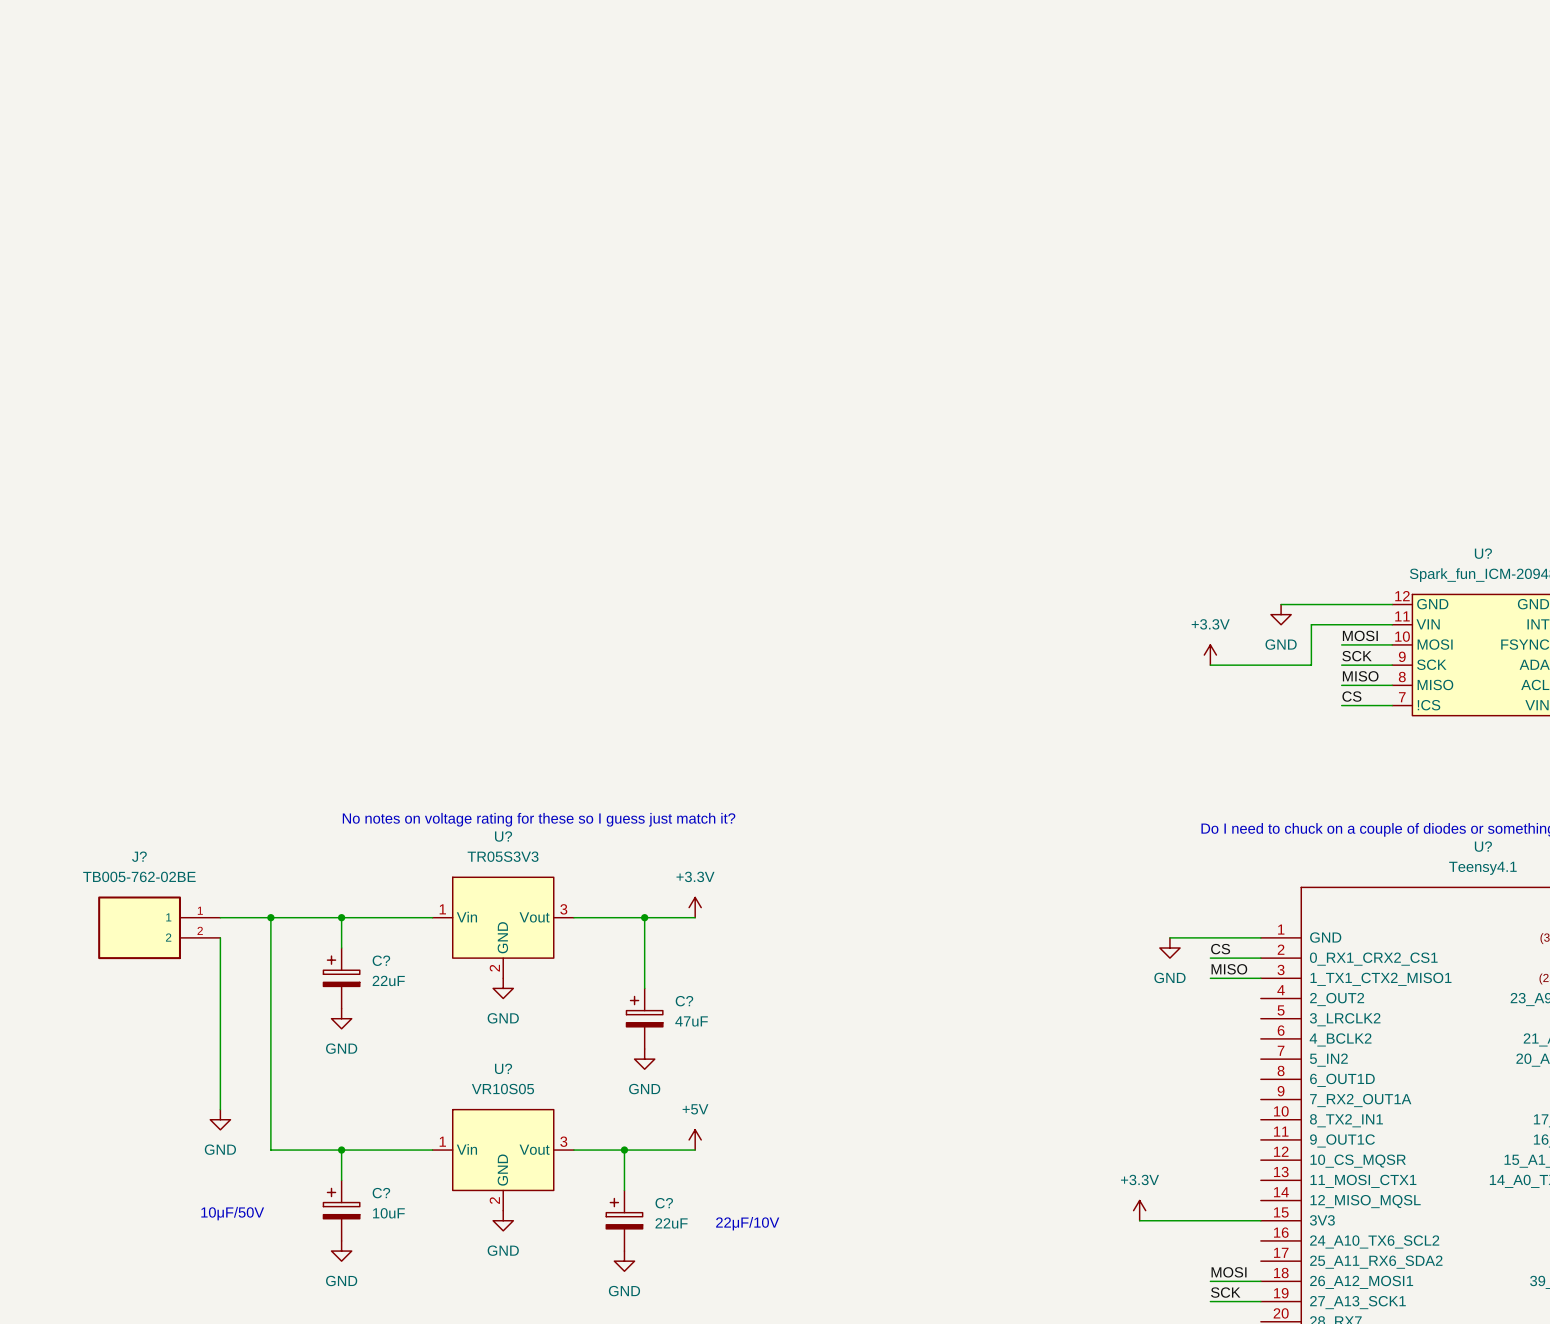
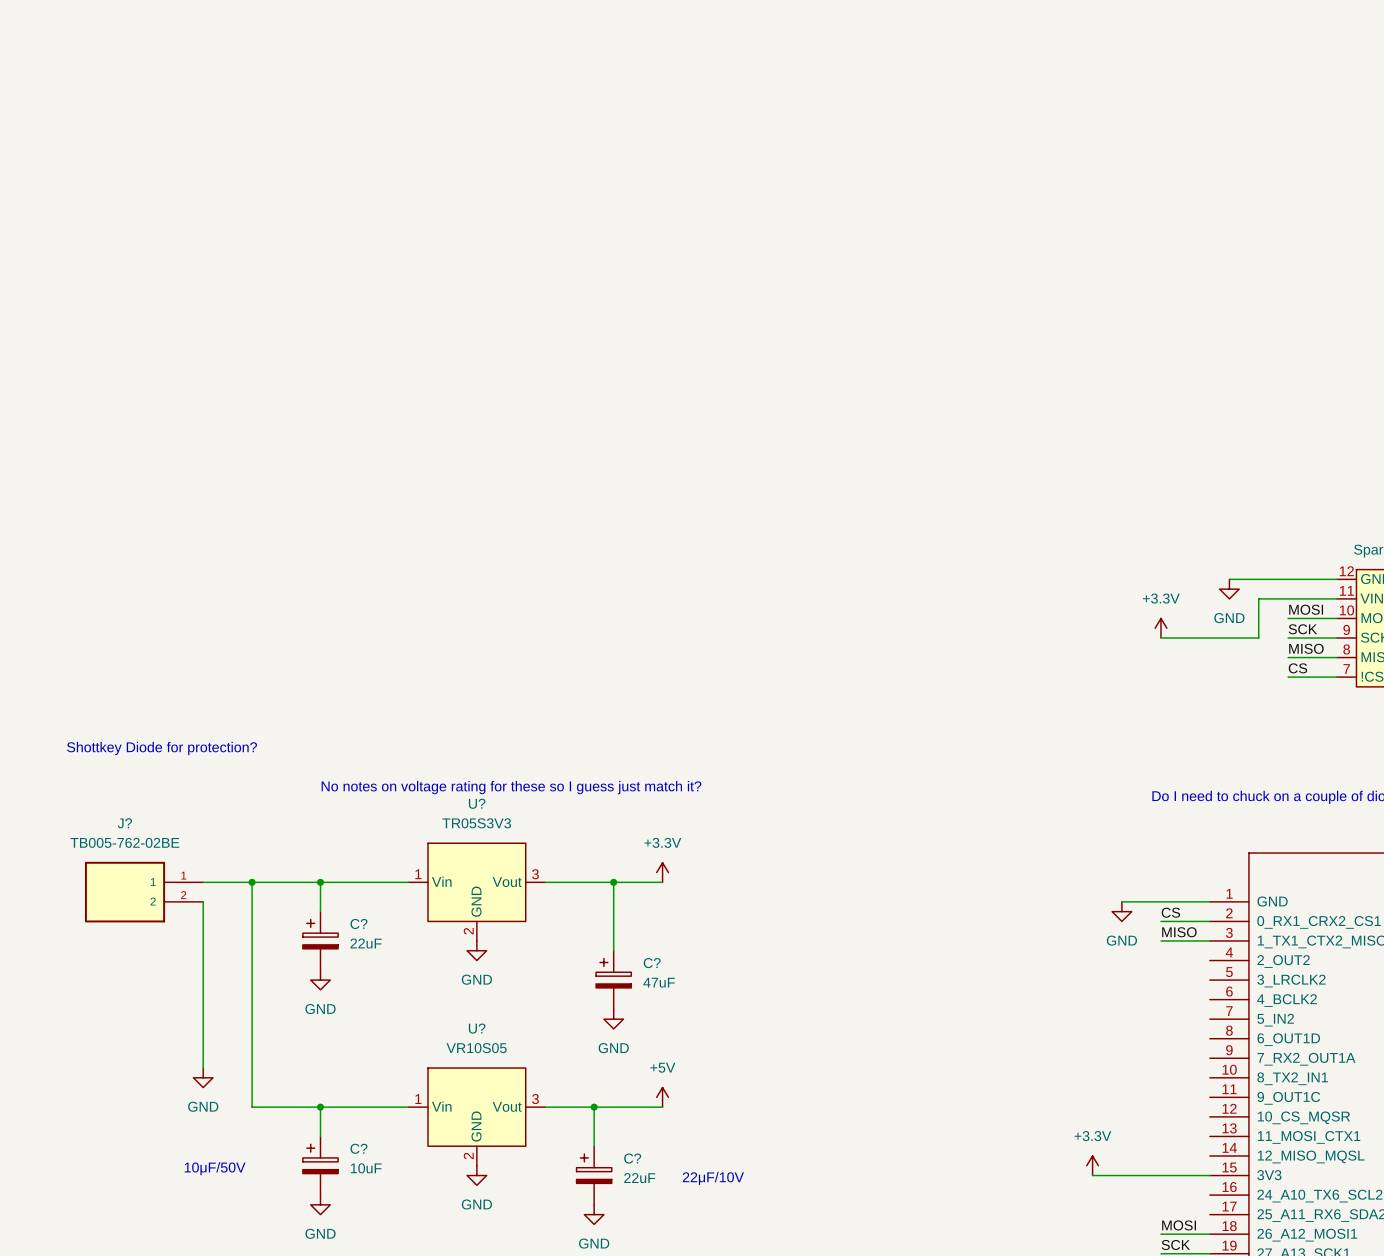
text: none -> Shottkey Diode for protection? (162, 748)

